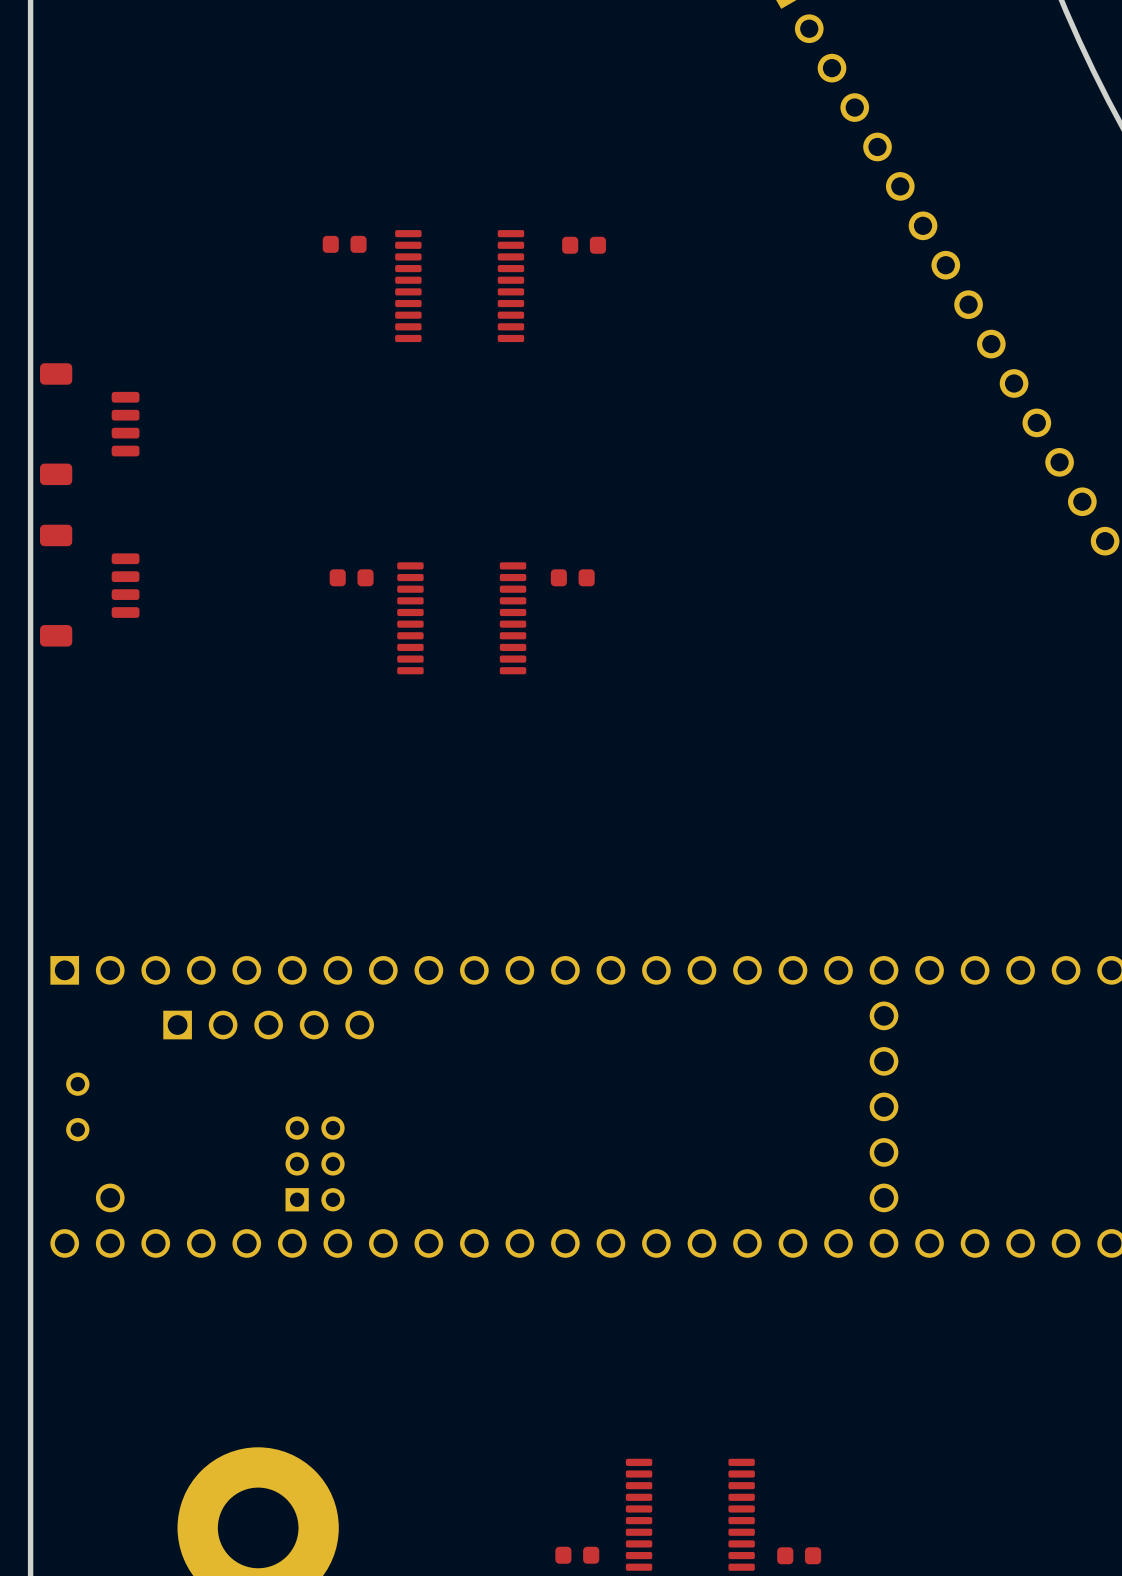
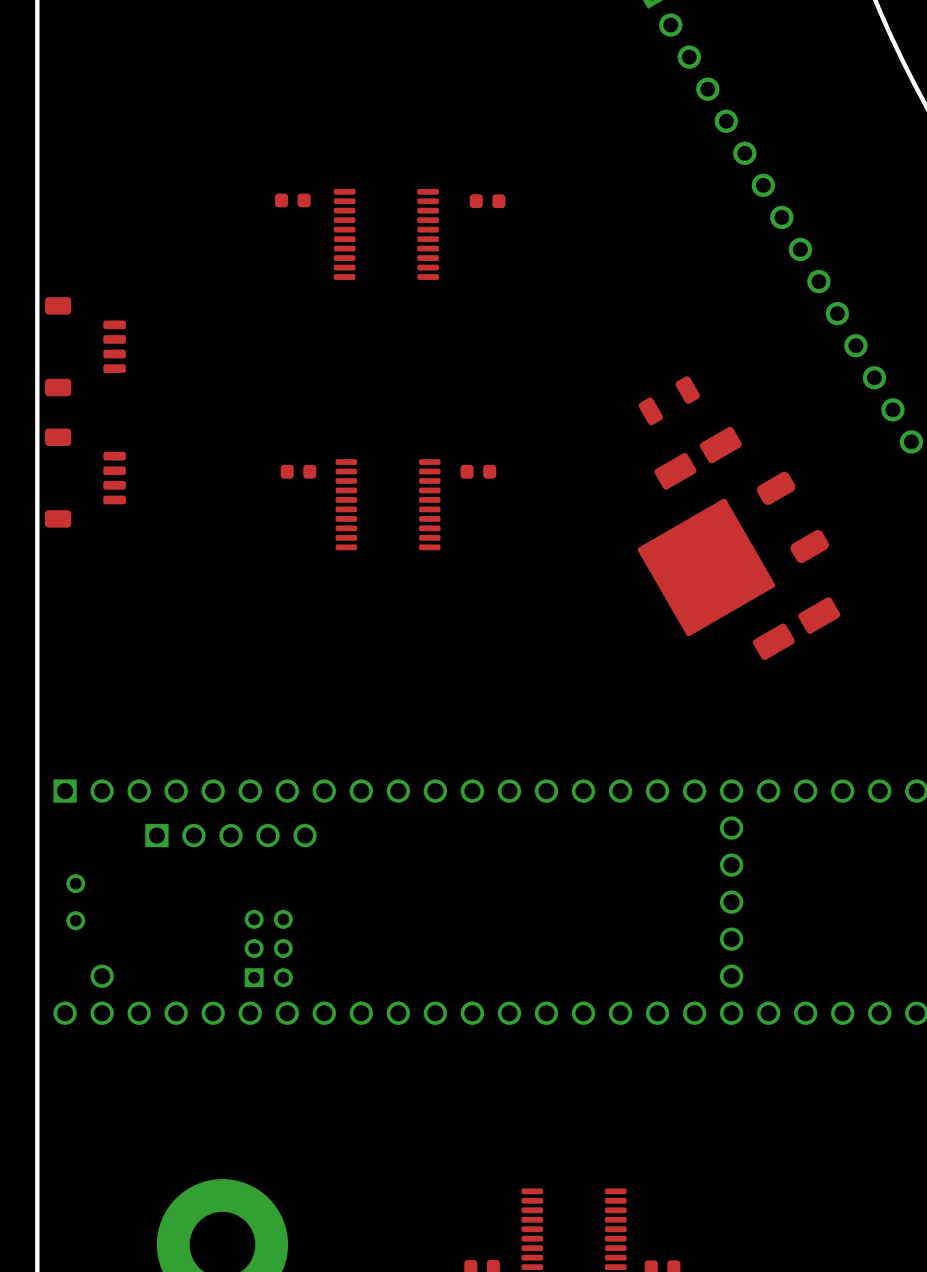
part: none -> (669, 400)
part: none -> (698, 458)
part: none -> (733, 554)
part: none -> (796, 628)

